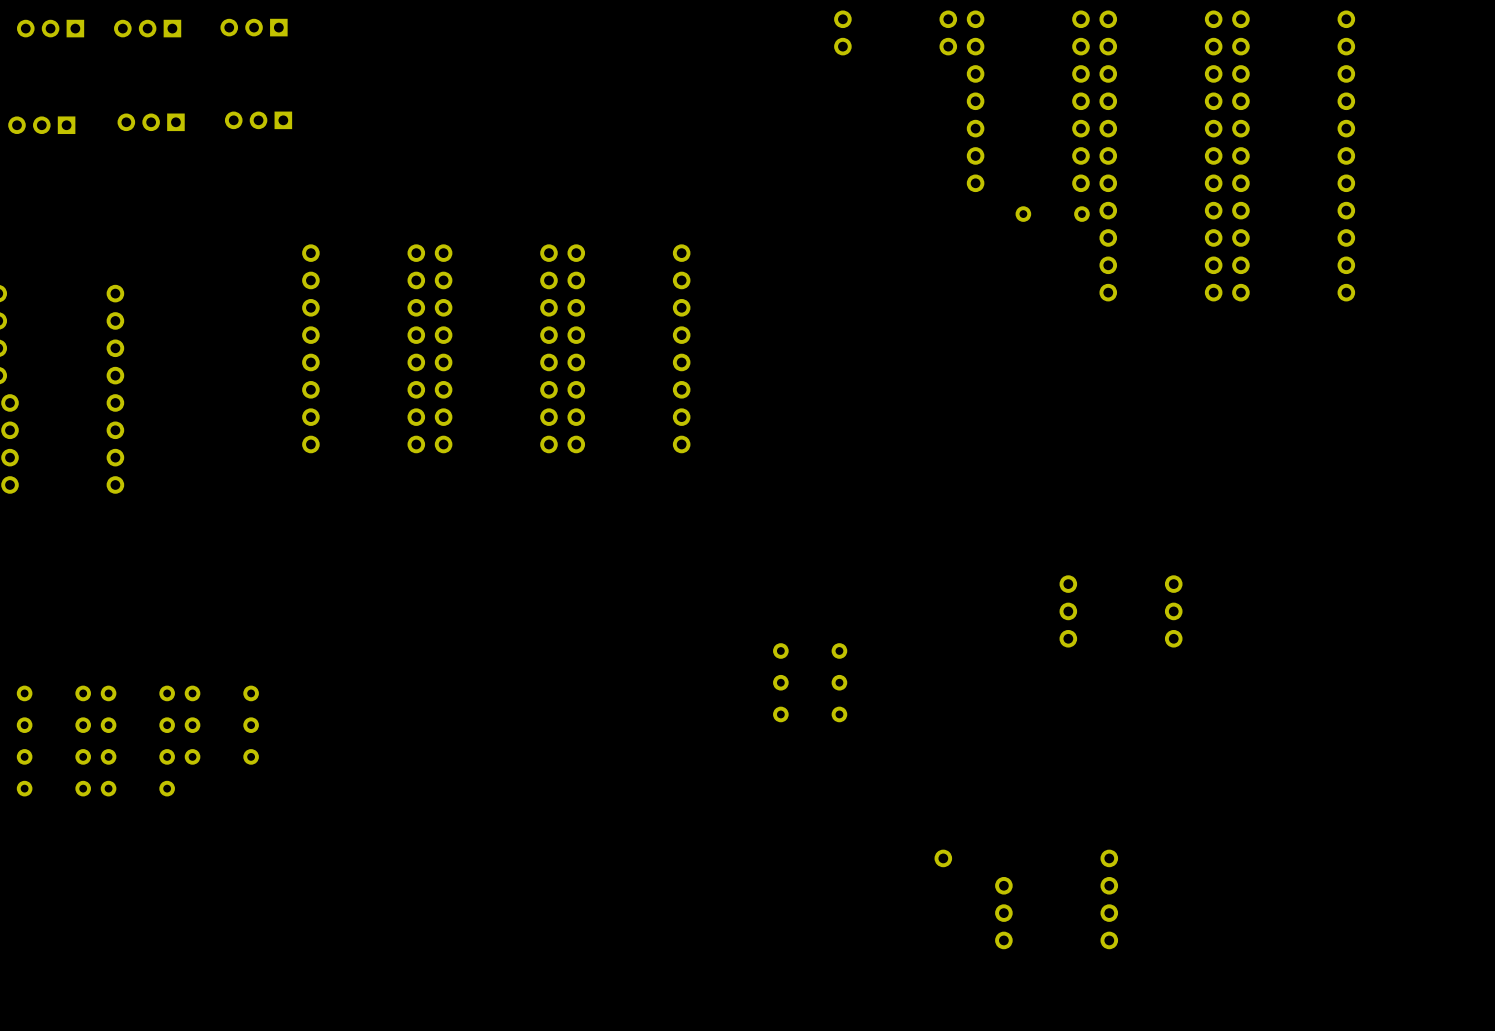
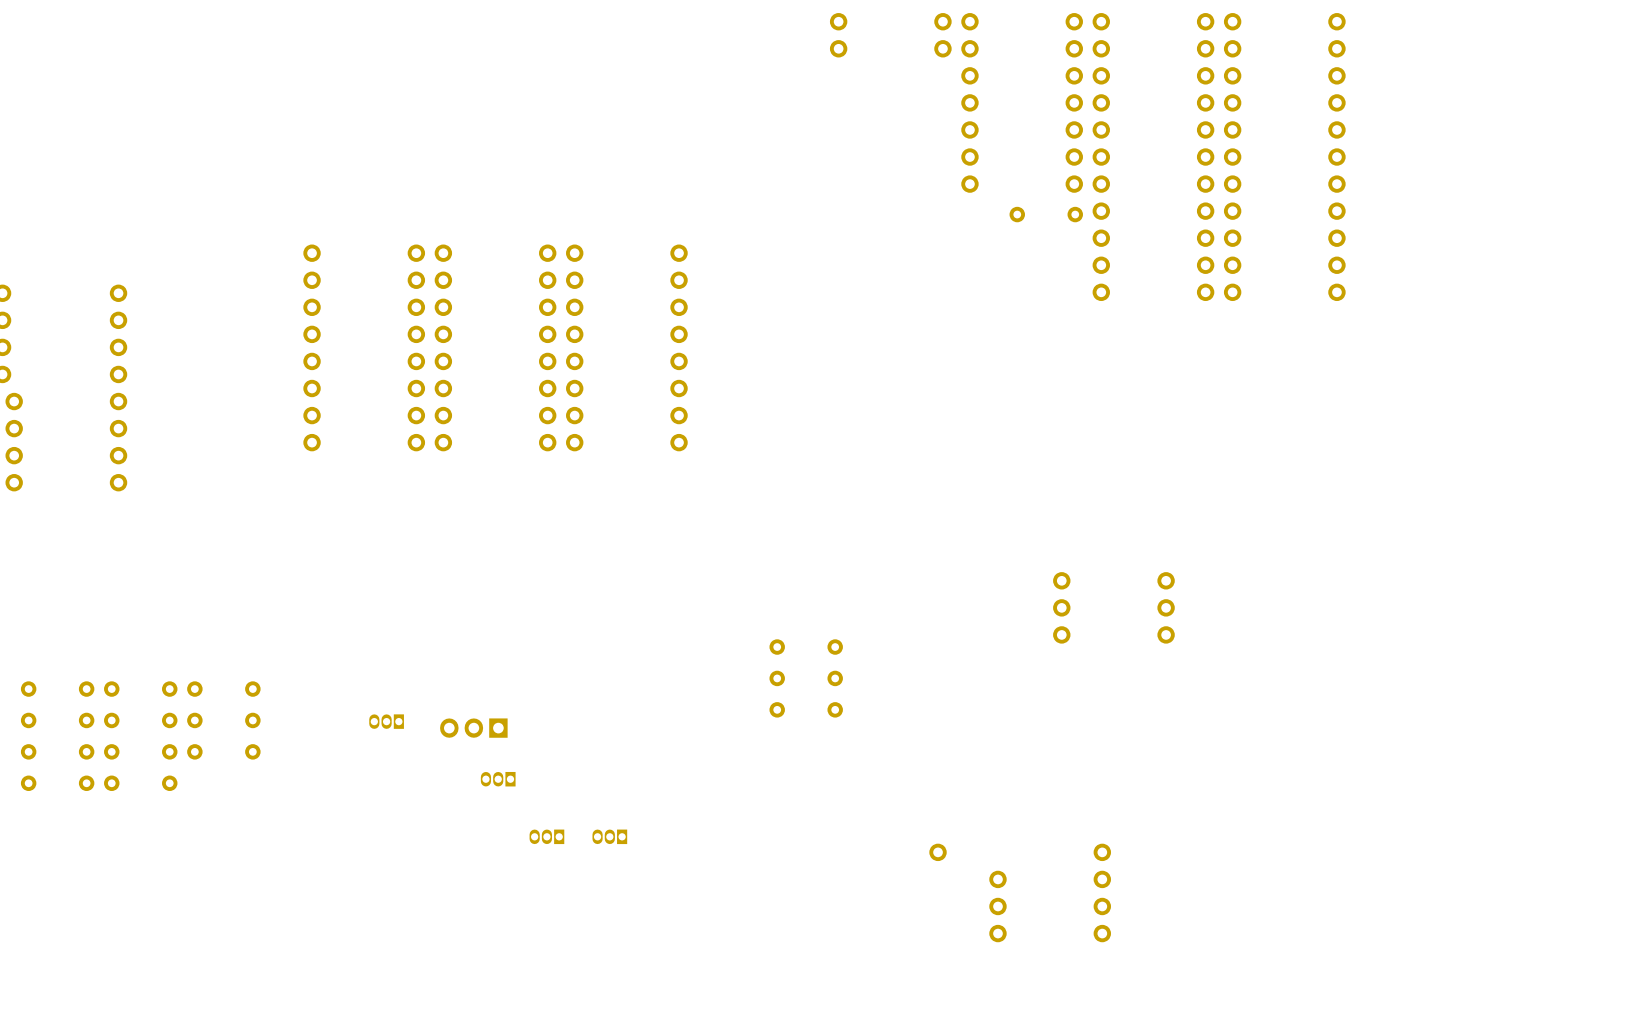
part: (254, 27) -> none
part: (50, 28) -> none
part: (147, 28) -> none
part: (258, 120) -> none
part: (151, 122) -> none
part: (41, 125) -> none
part: none -> (386, 721)
part: none -> (473, 728)
part: none -> (498, 779)
part: none -> (546, 836)
part: none -> (609, 836)

